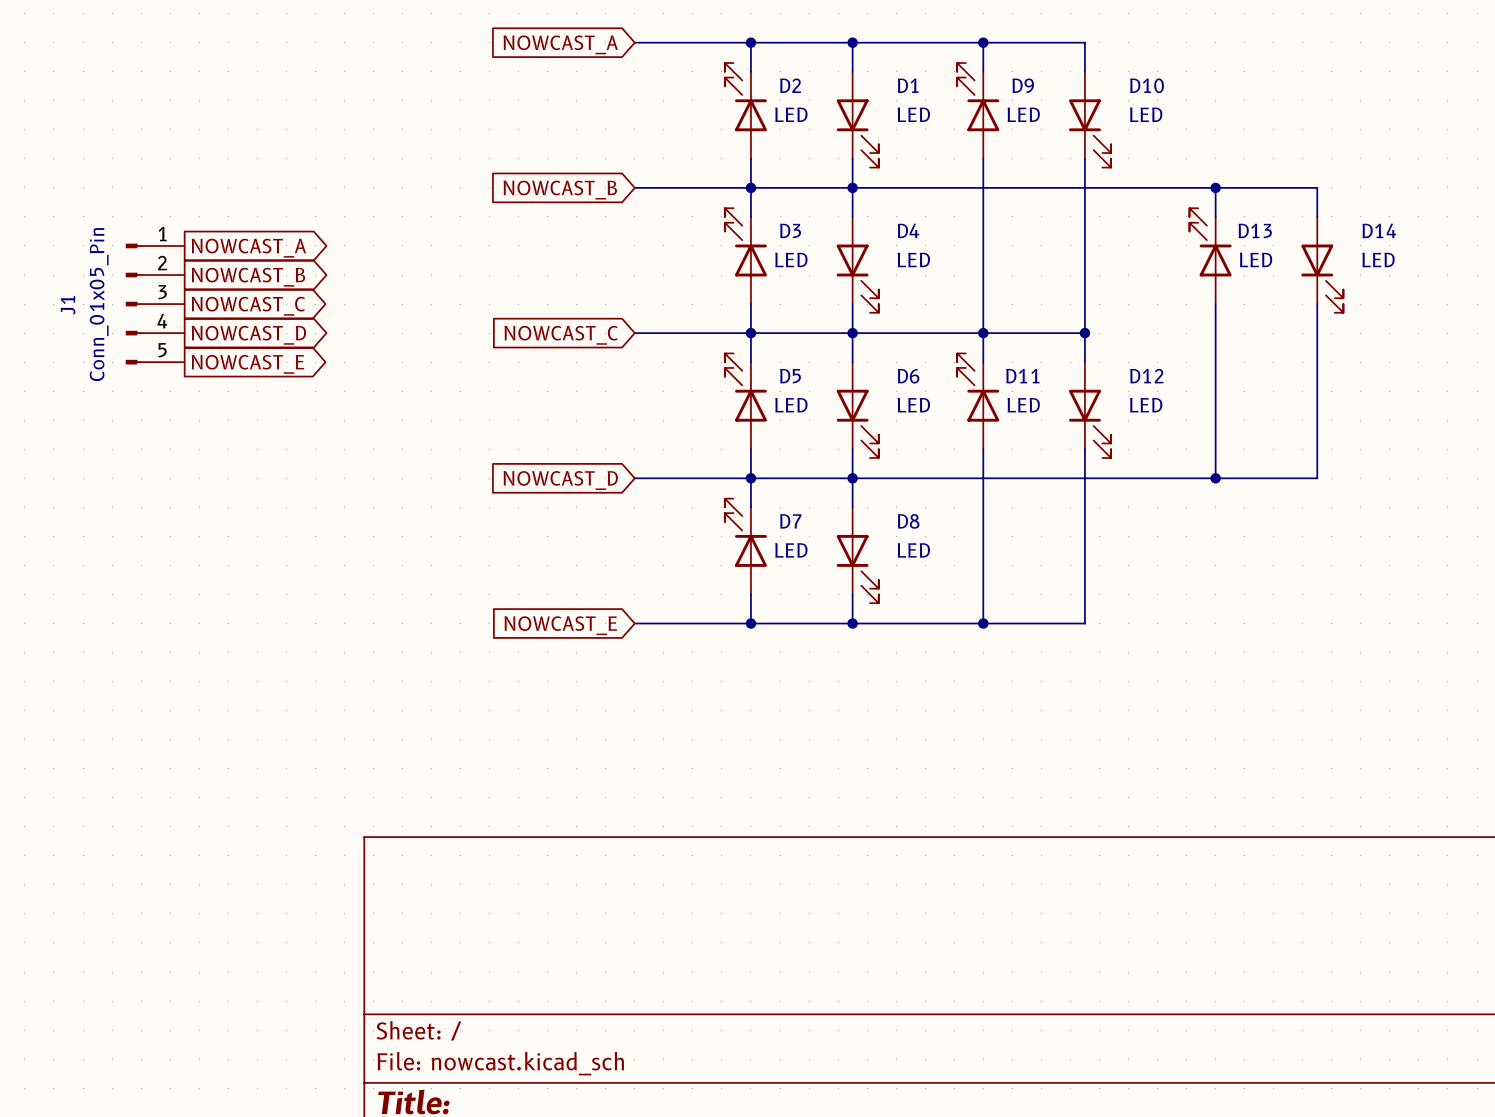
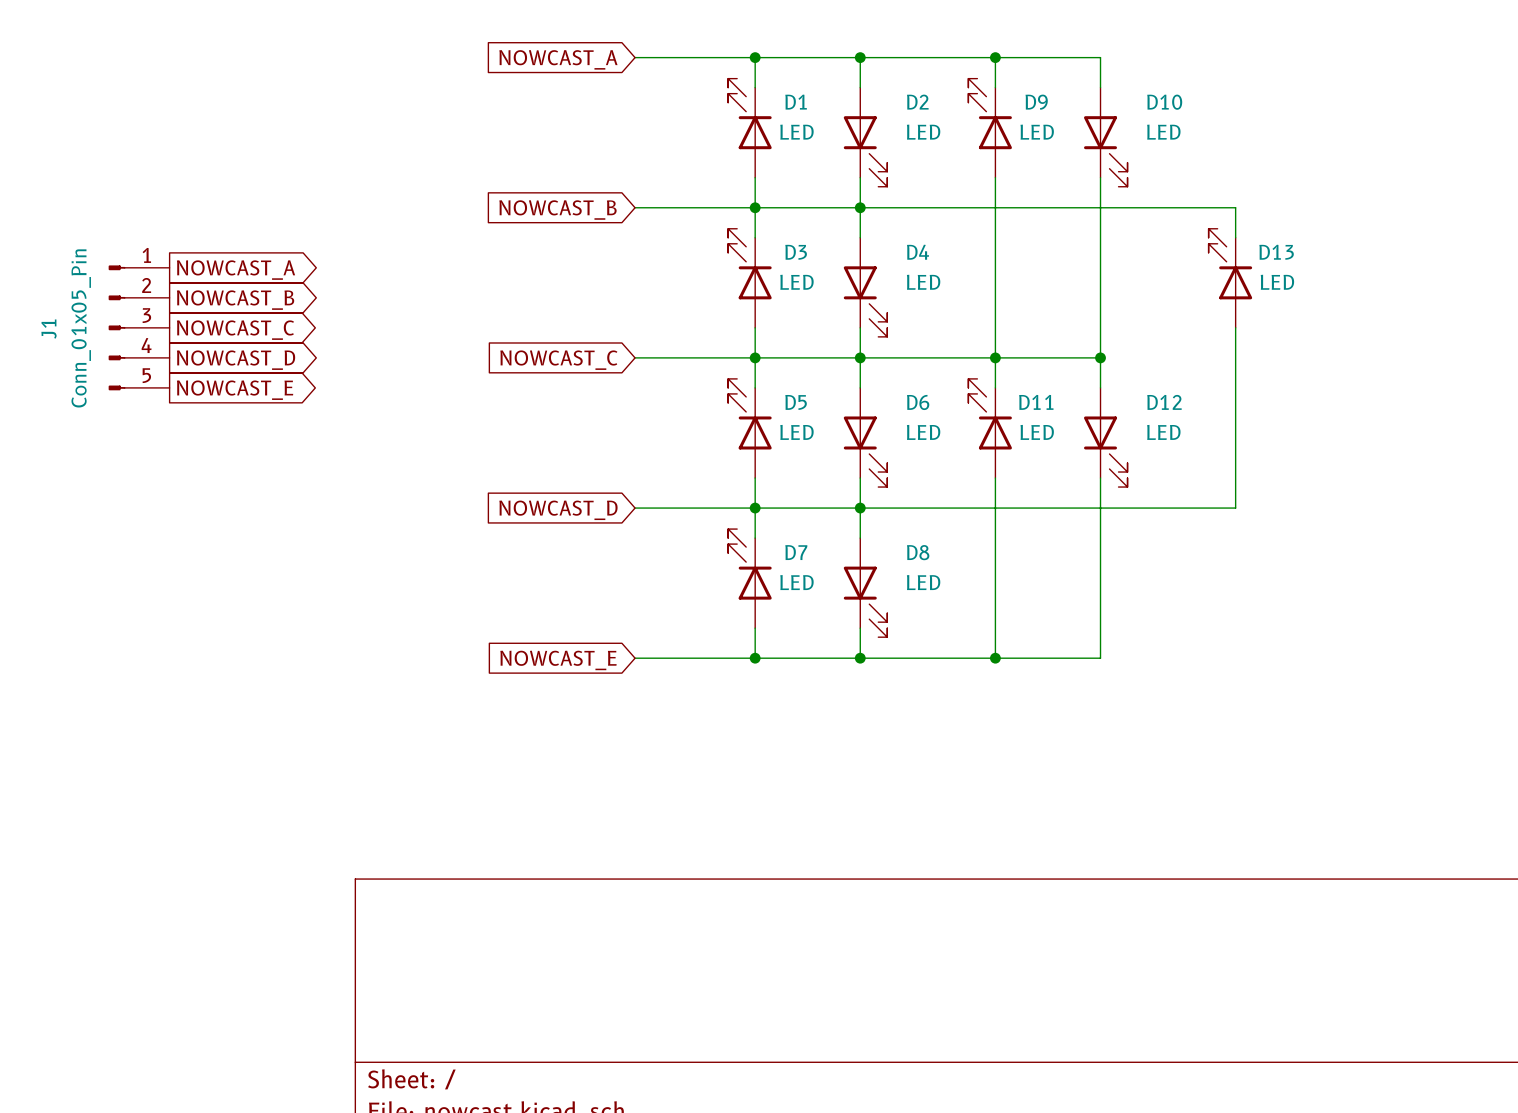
D2 name: D2 (790, 85) -> D1 (796, 102)
D1 name: D1 (908, 85) -> D2 (917, 102)
wire: (1215, 187) (1317, 187) (1317, 216) -> none
junction: (1215, 187) -> none
D14: LED (1322, 264) -> none
wire: (1317, 304) (1317, 478) (1215, 478) -> none
junction: (1215, 478) -> none

